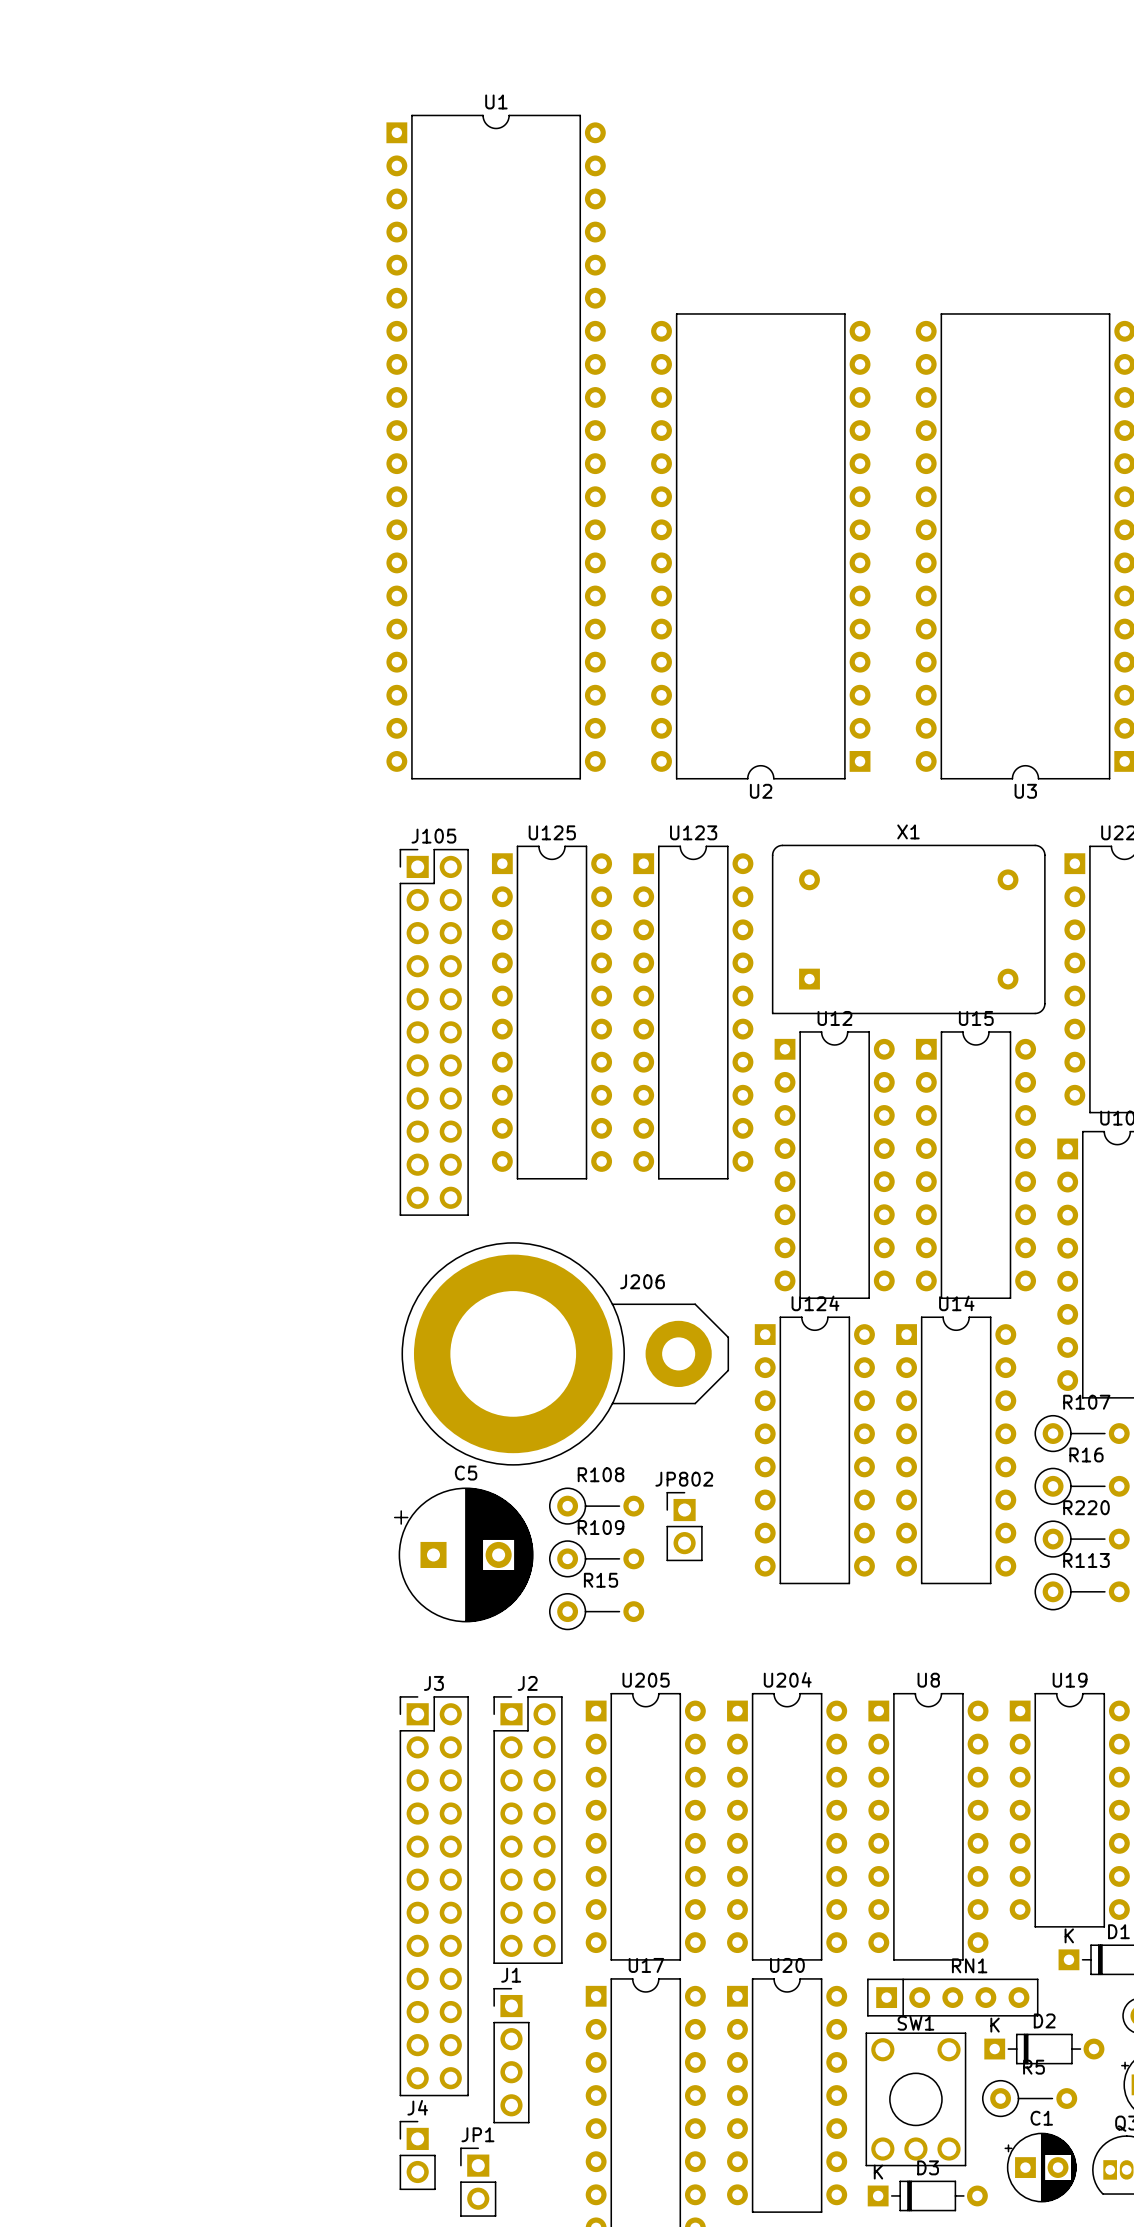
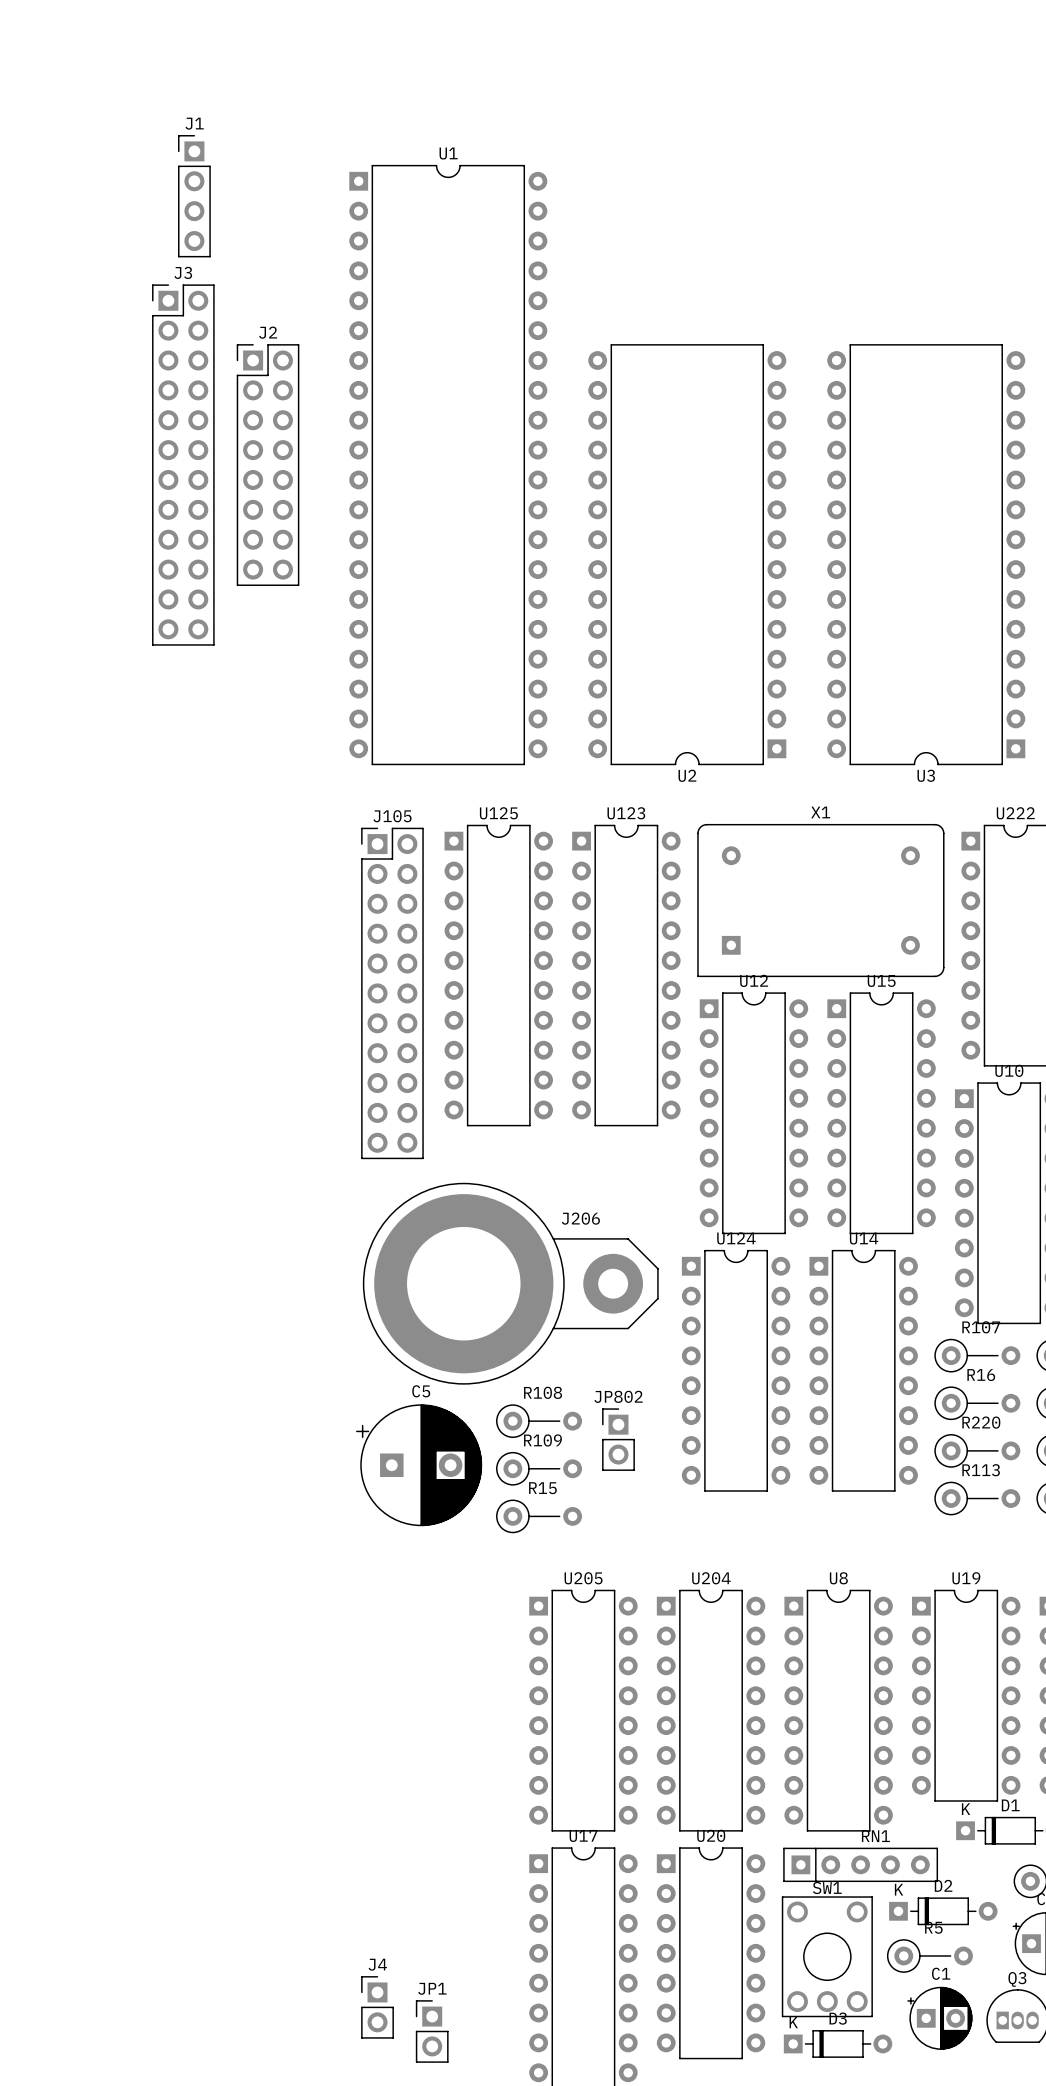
J2 position: (528, 1830) -> (268, 465)
J3 position: (434, 1896) -> (183, 465)
J1 position: (511, 2055) -> (194, 196)

